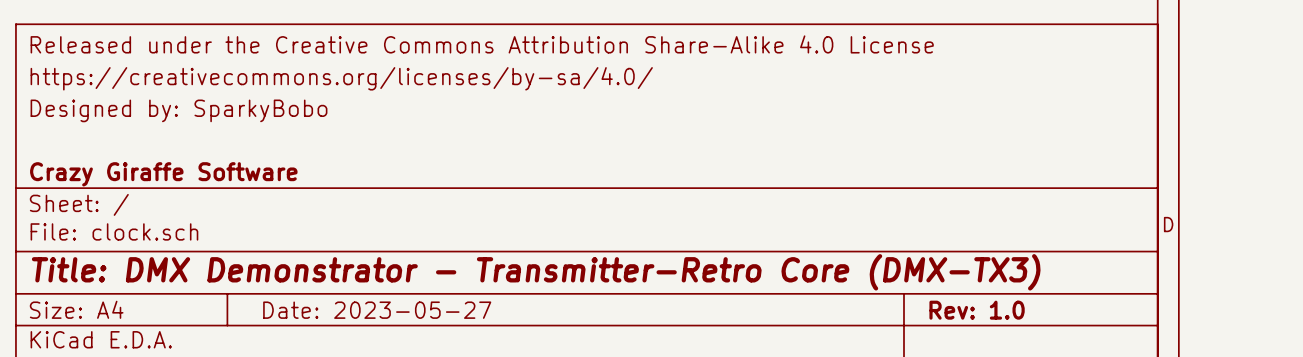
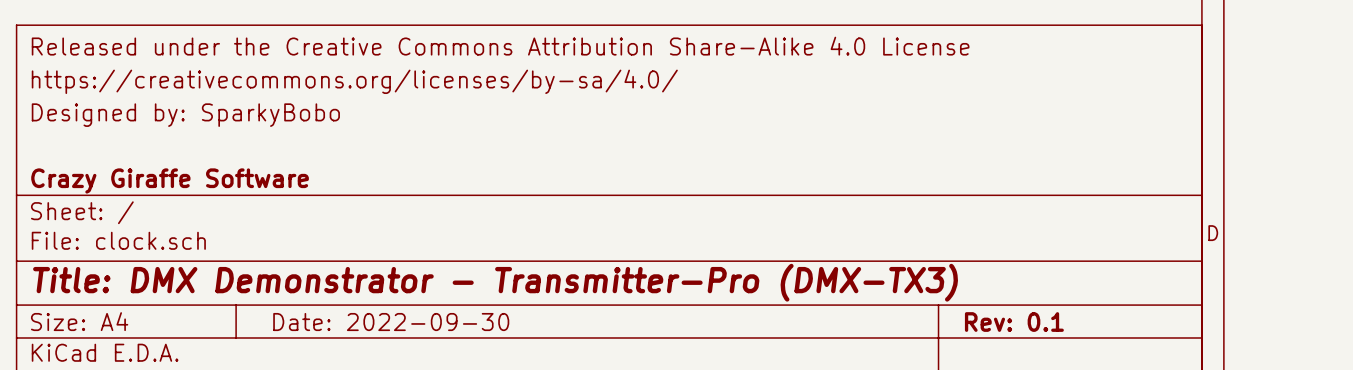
title block: Title: DMX Demonstrator - Transmitter-Retro Core (DMX-TX3) (536, 272) -> Title: DMX Demonstrator - Transmitter-Pro (DMX-TX3) (495, 282)
title block: Date: 2023-05-27 (377, 310) -> Date: 2022-09-30 (391, 322)
title block: Rev: 1.0 (977, 310) -> Rev: 0.1 (1014, 322)

